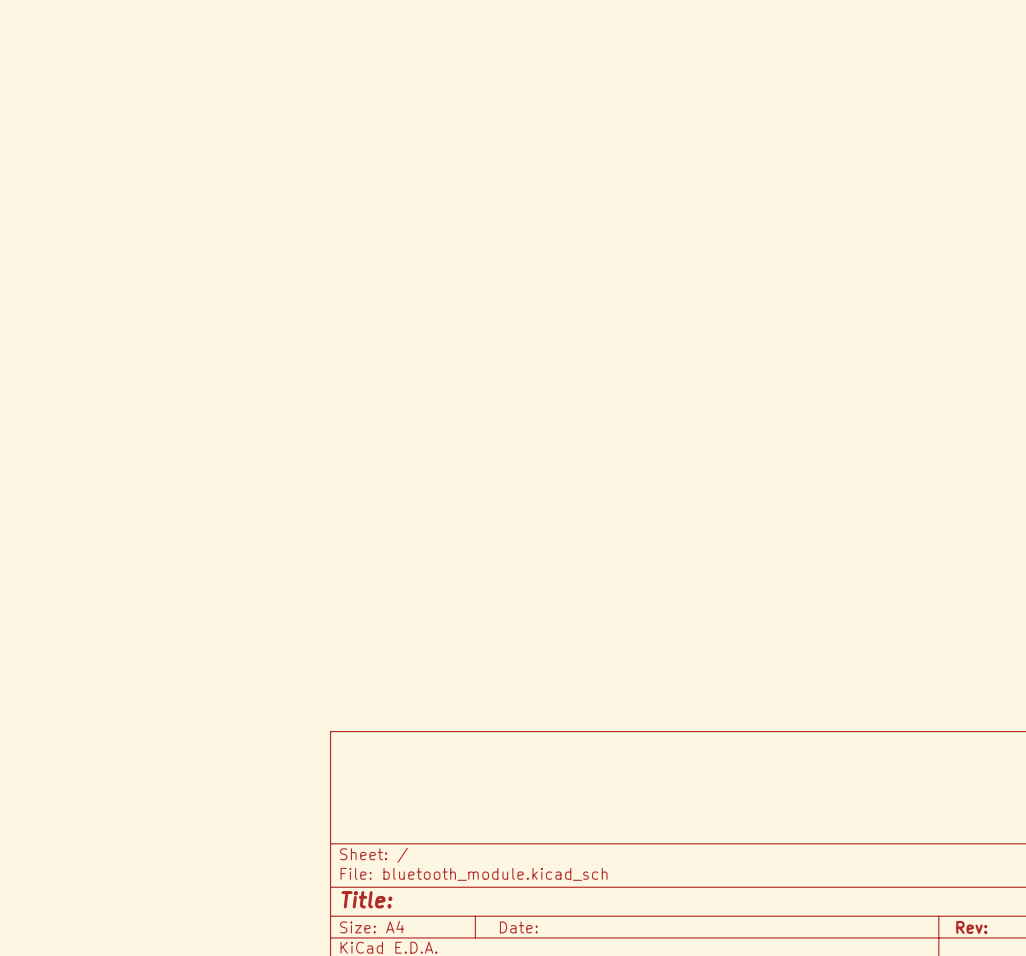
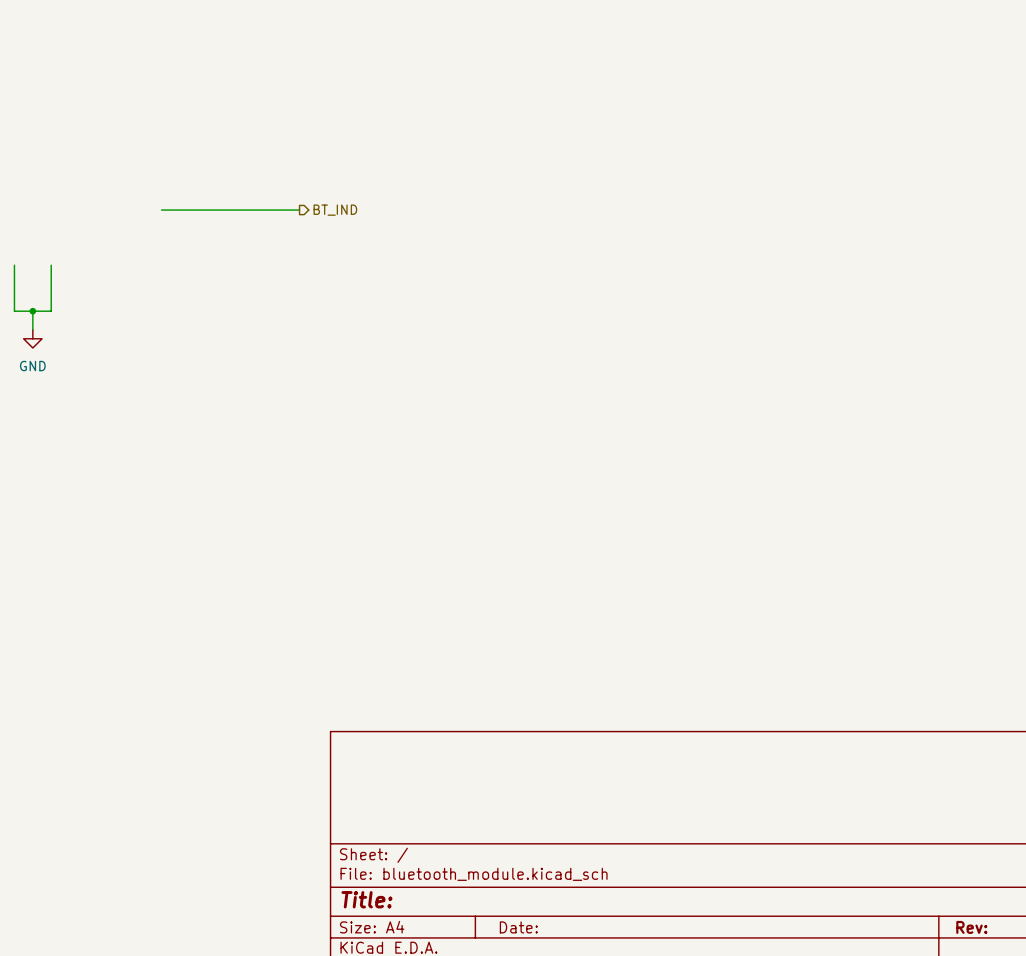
wire: none -> (161, 210) (299, 210)
hierarchical label: none -> BT_IND (335, 210)
wire: none -> (14, 265) (14, 311) (51, 311) (51, 265)
wire: none -> (32, 311) (32, 329)
junction: none -> (32, 311)
power symbol: none -> GND (32, 338)

